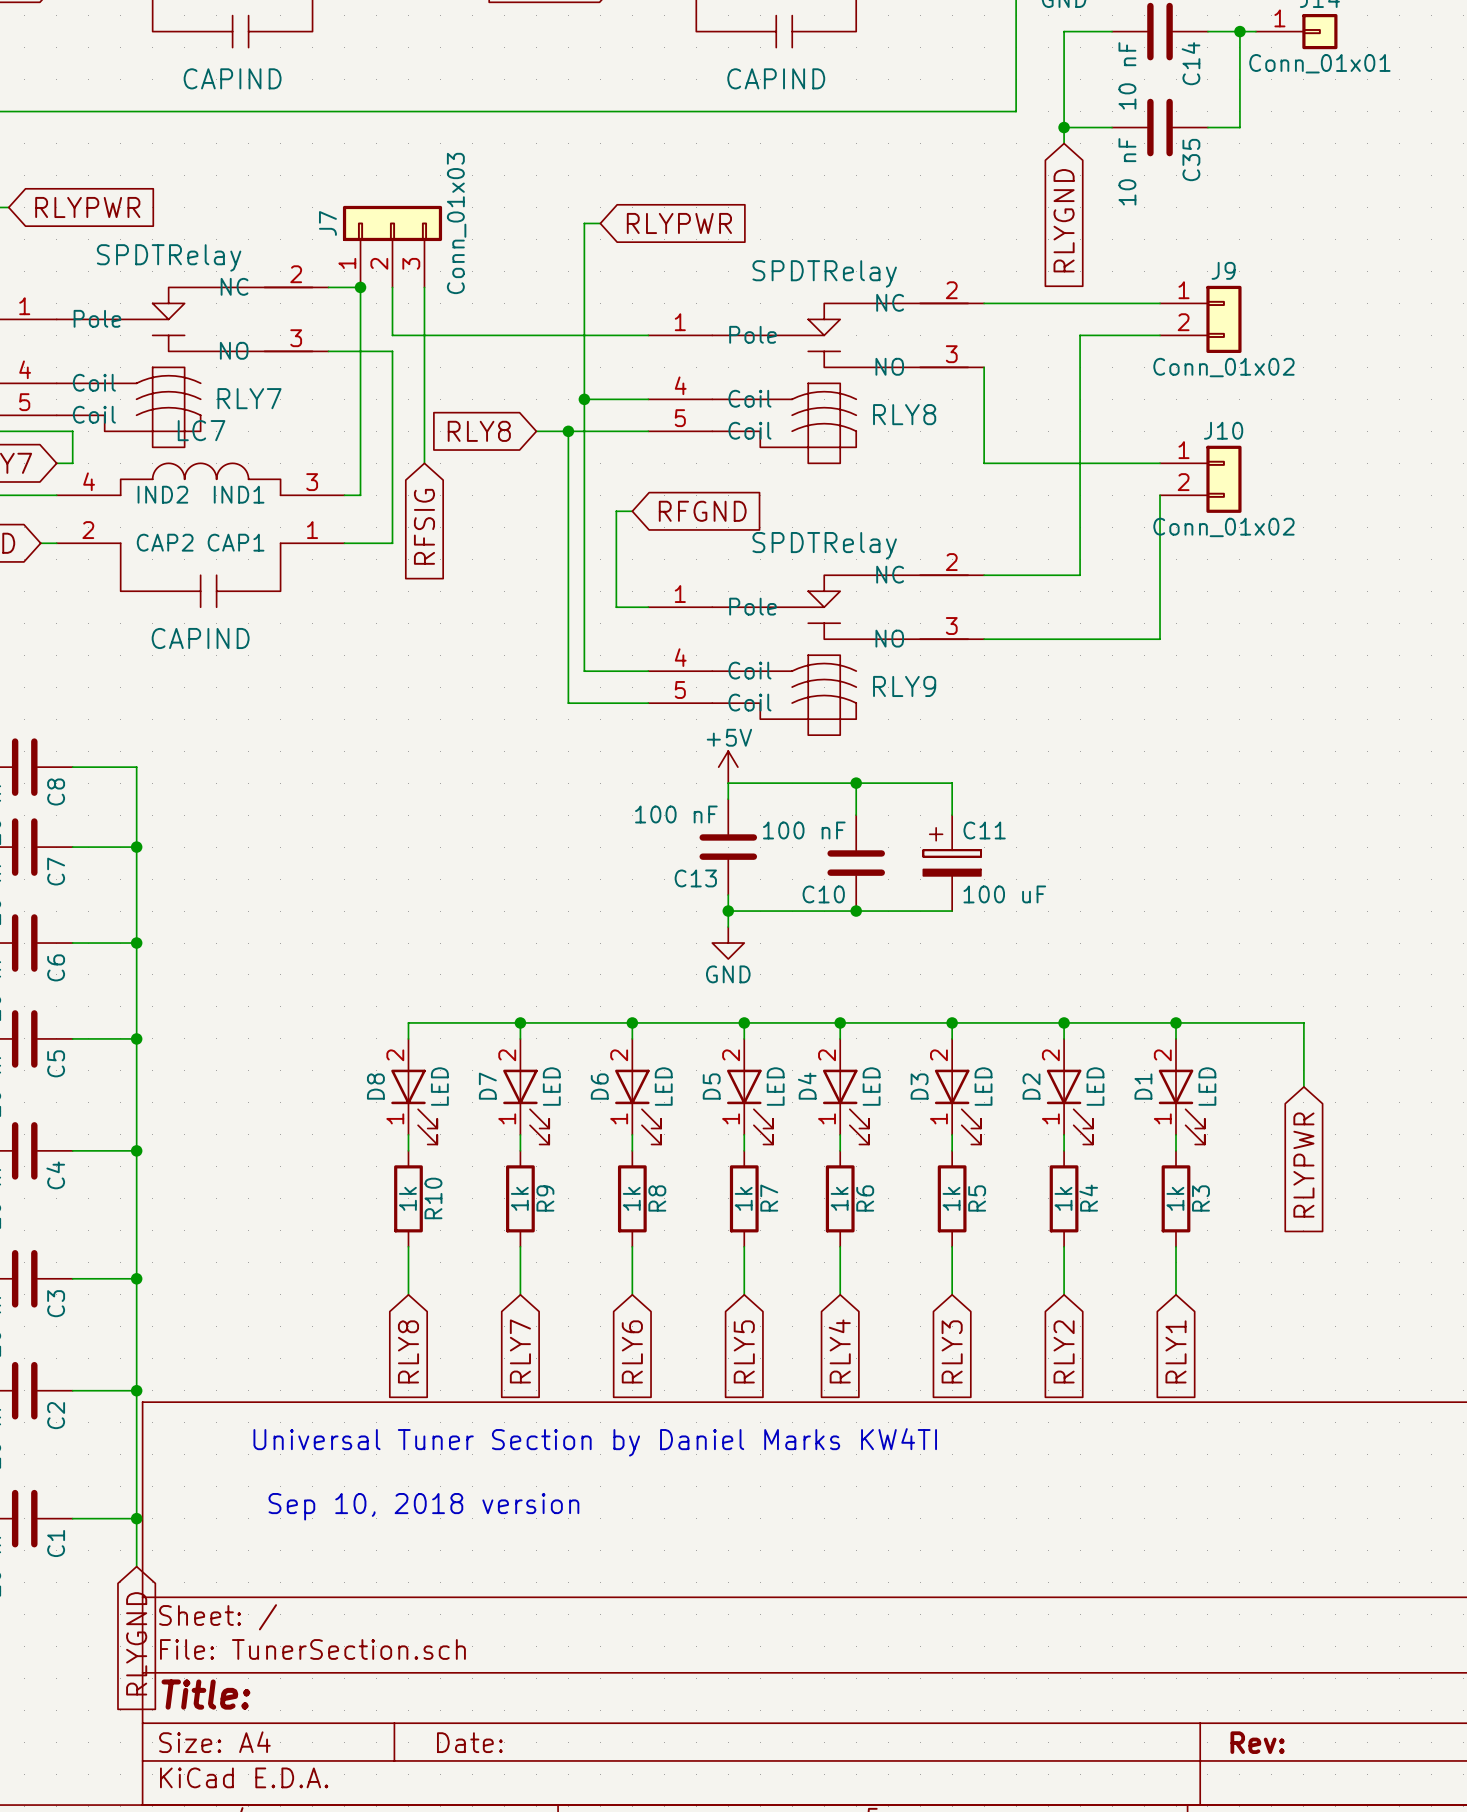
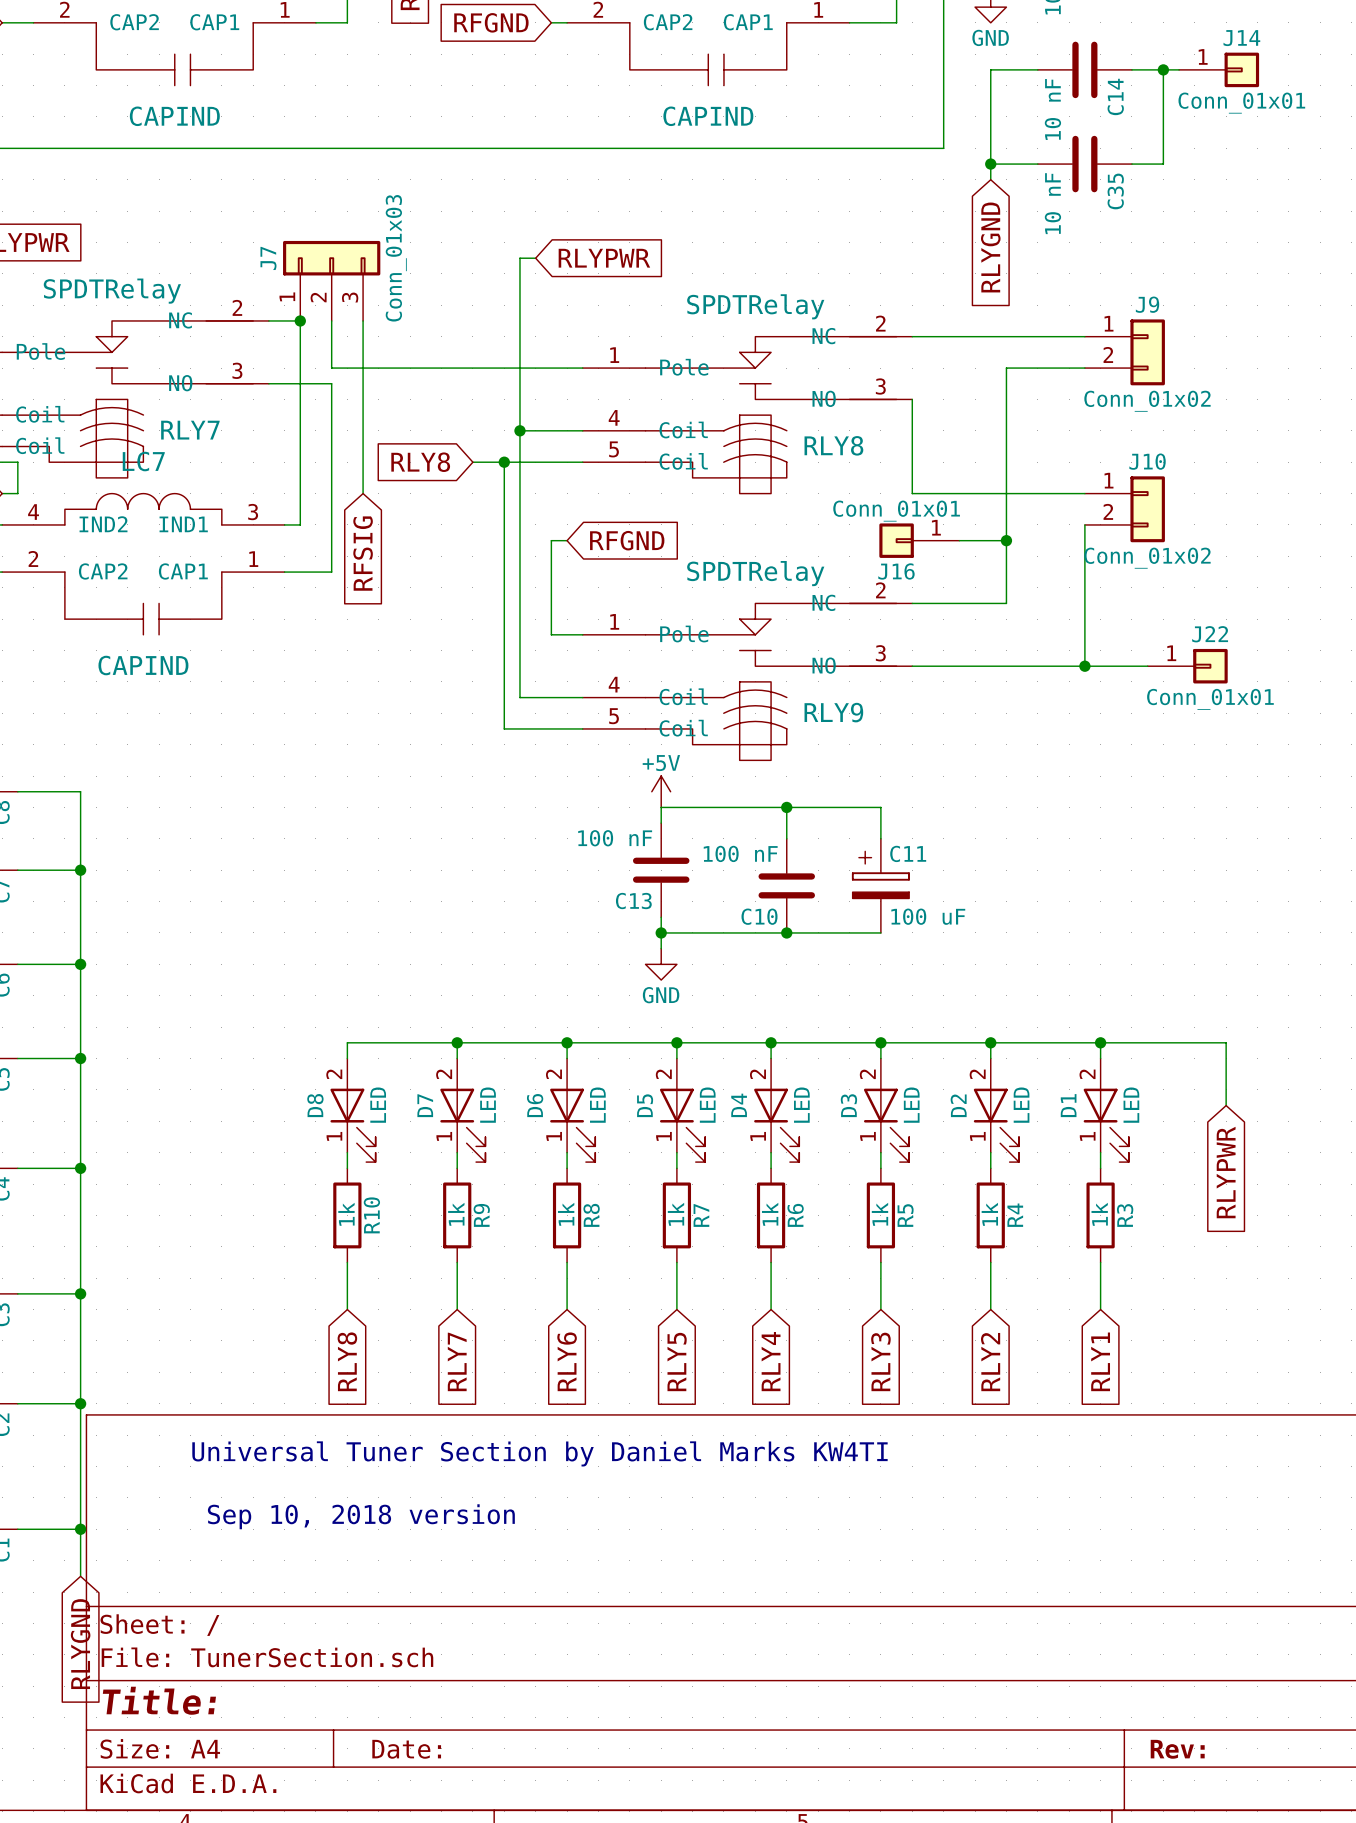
J16: none -> Conn_01x01 (919, 540)
wire: none -> (959, 540) (1006, 540)
junction: none -> (1006, 540)
wire: none -> (1084, 666) (1147, 666)
junction: none -> (1084, 666)
J22: none -> Conn_01x01 (1187, 666)

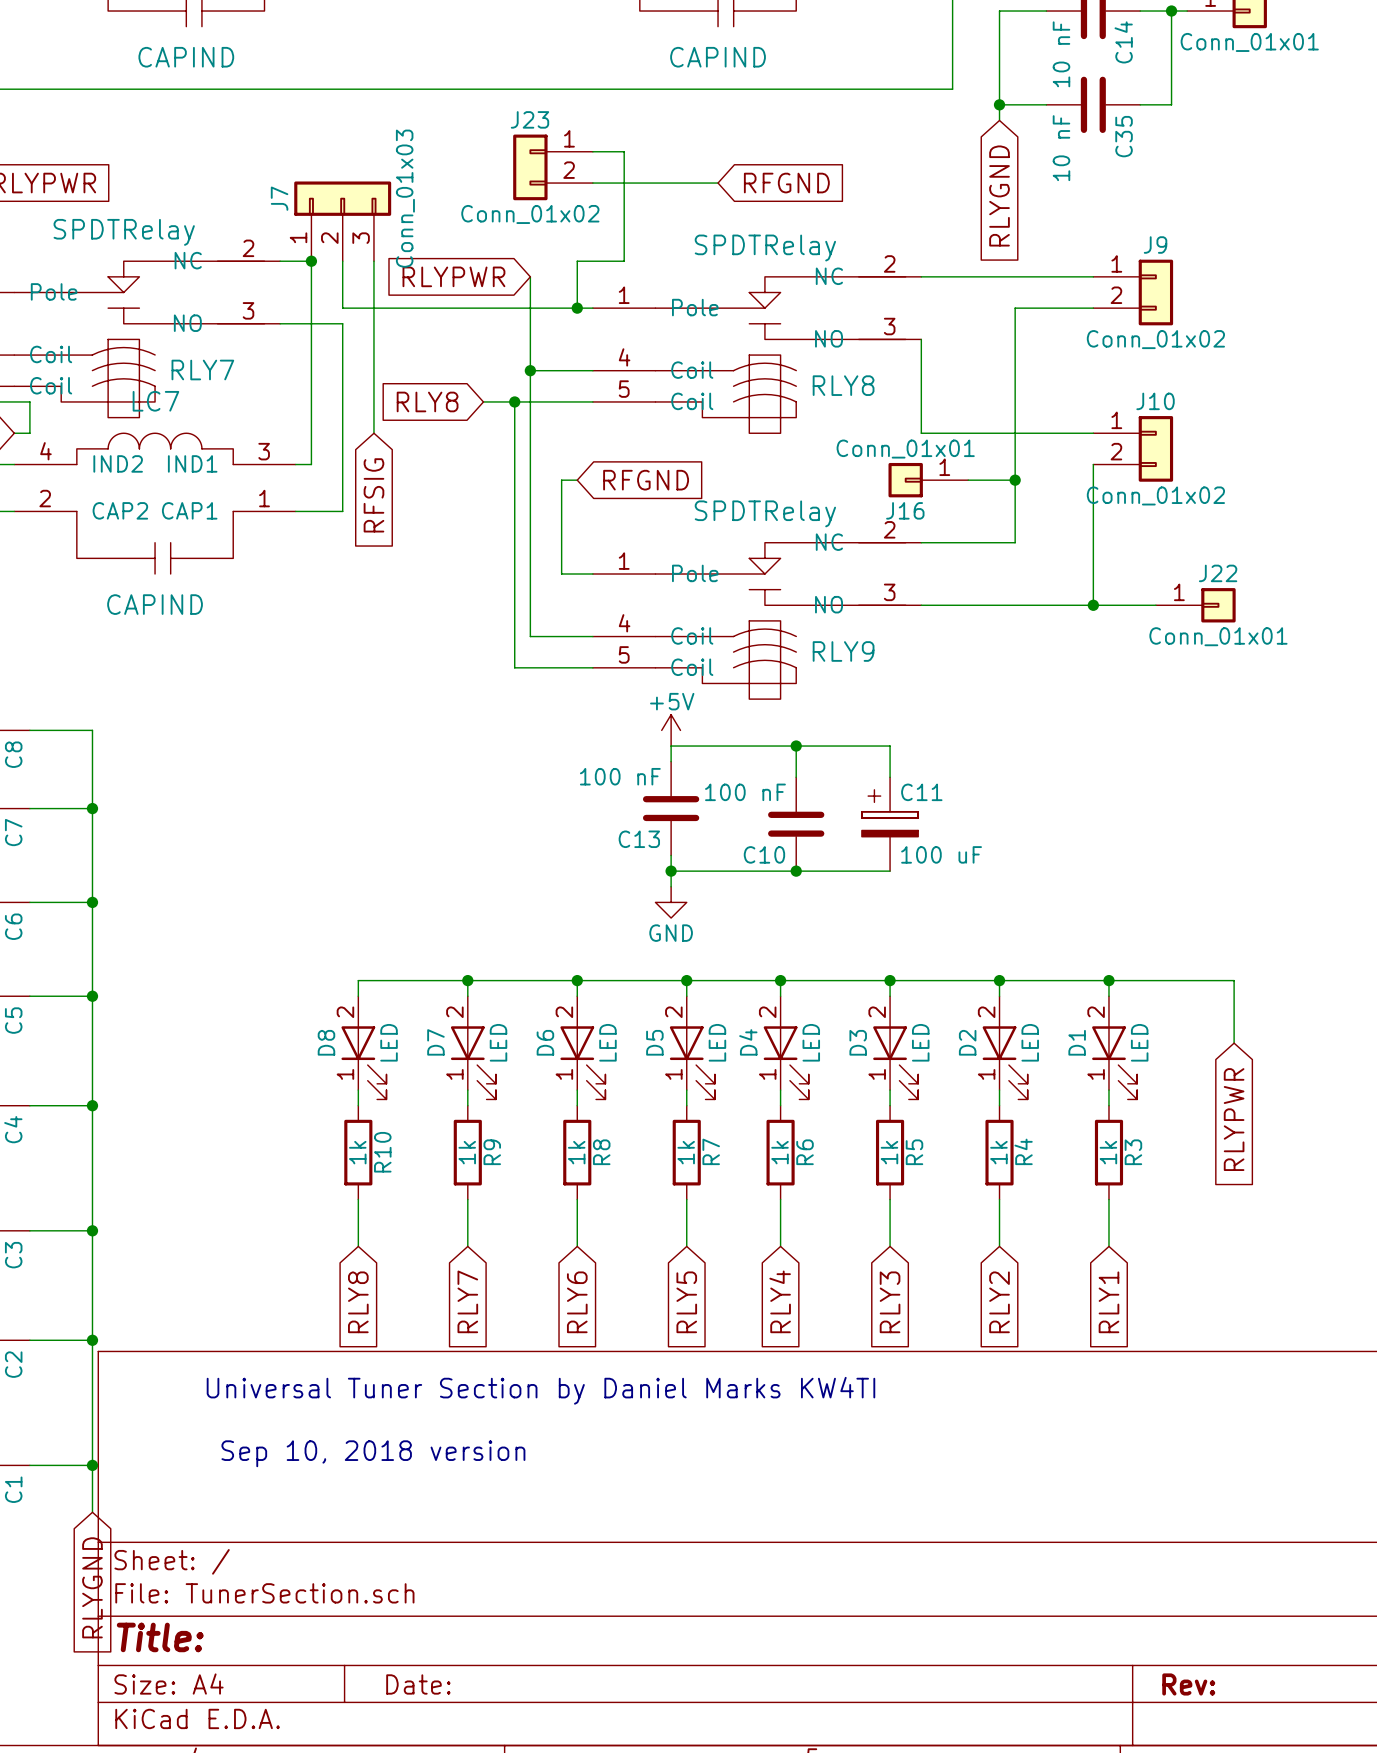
wire: none -> (592, 151) (624, 151) (624, 261) (577, 261) (577, 308)
J23: none -> Conn_01x02 (553, 167)
wire: none -> (592, 183) (718, 183)
global label: none -> RFGND (786, 183)
wire: (535, 258) (519, 258) (519, 336) -> none
global label rotation: 0° (604, 258) -> 180° (453, 276)
global label position: RLYPWR (604, 258) -> RLYPWR (453, 276)
junction: none -> (577, 308)

